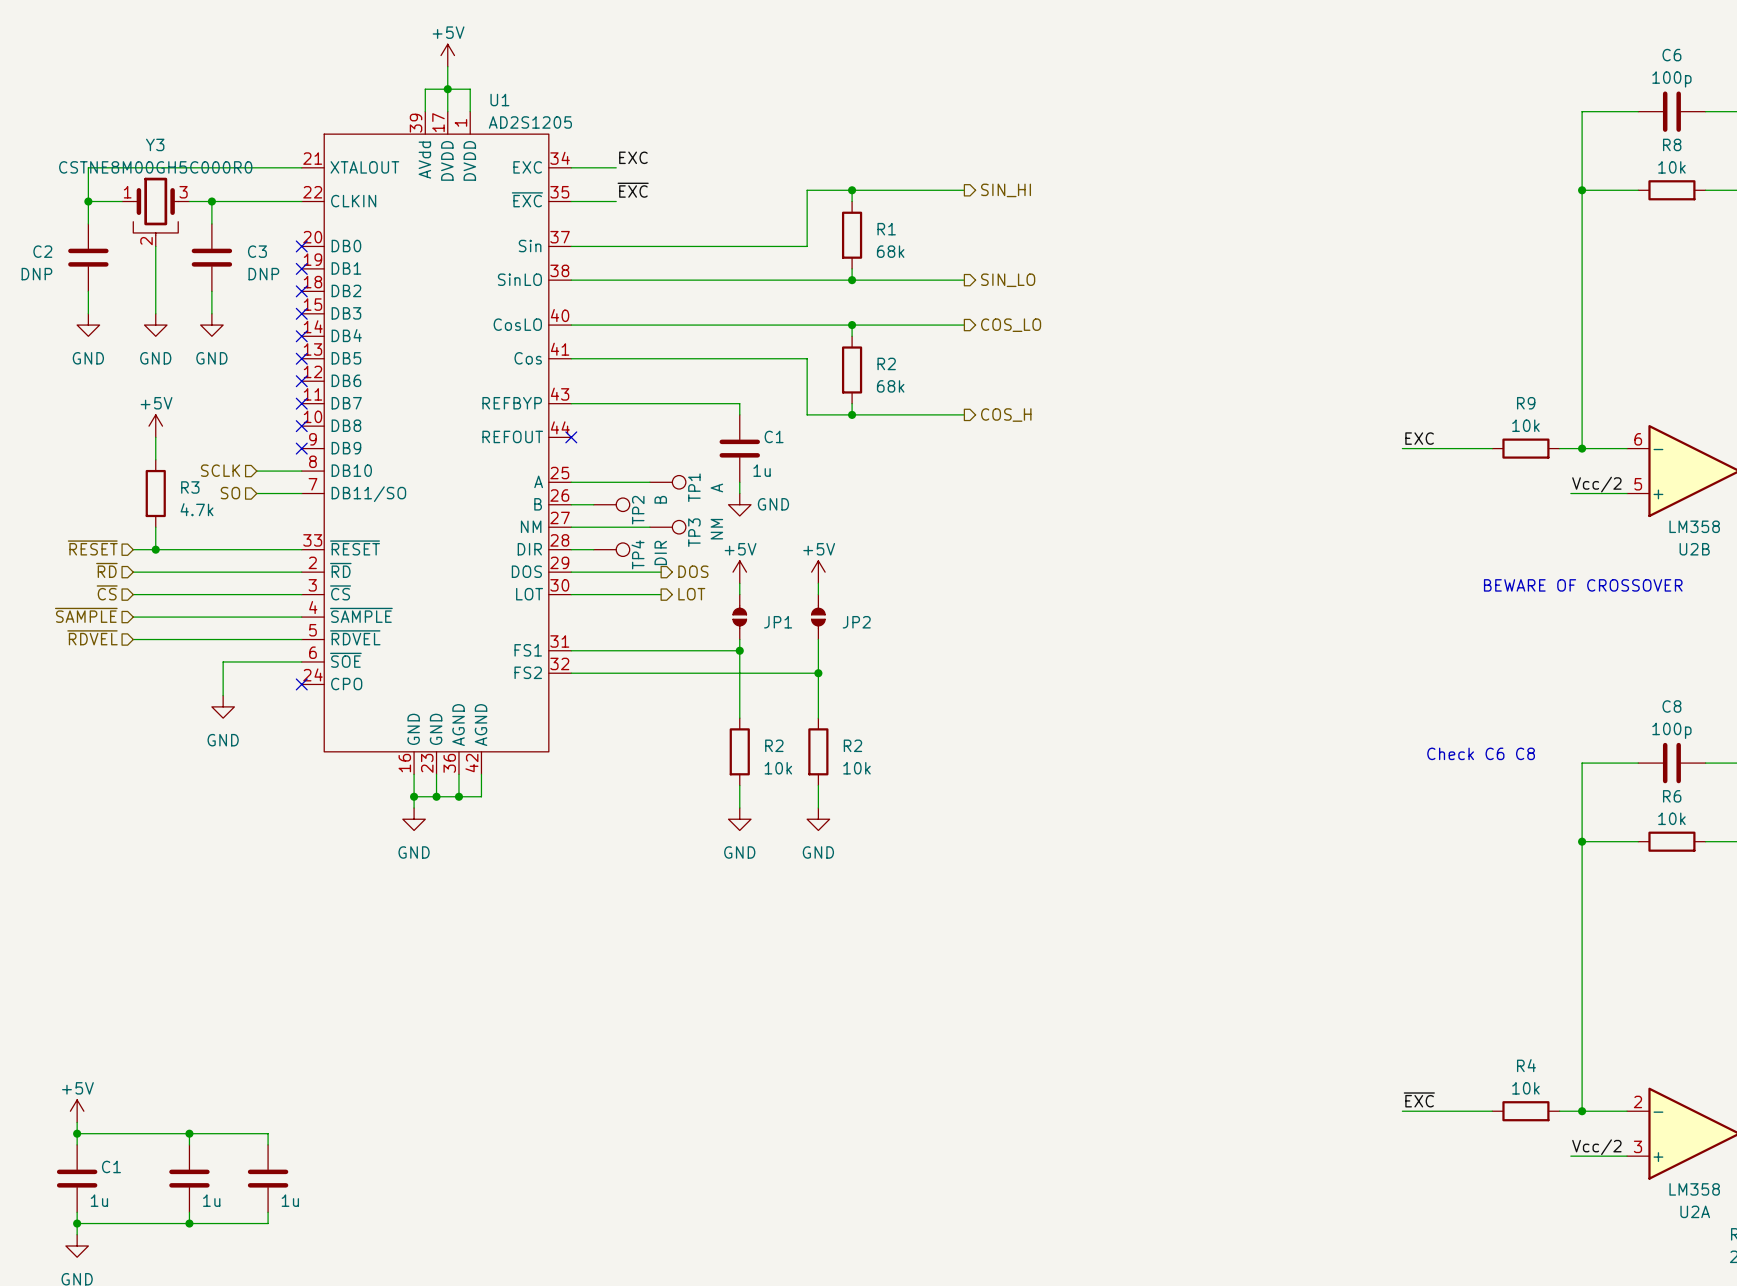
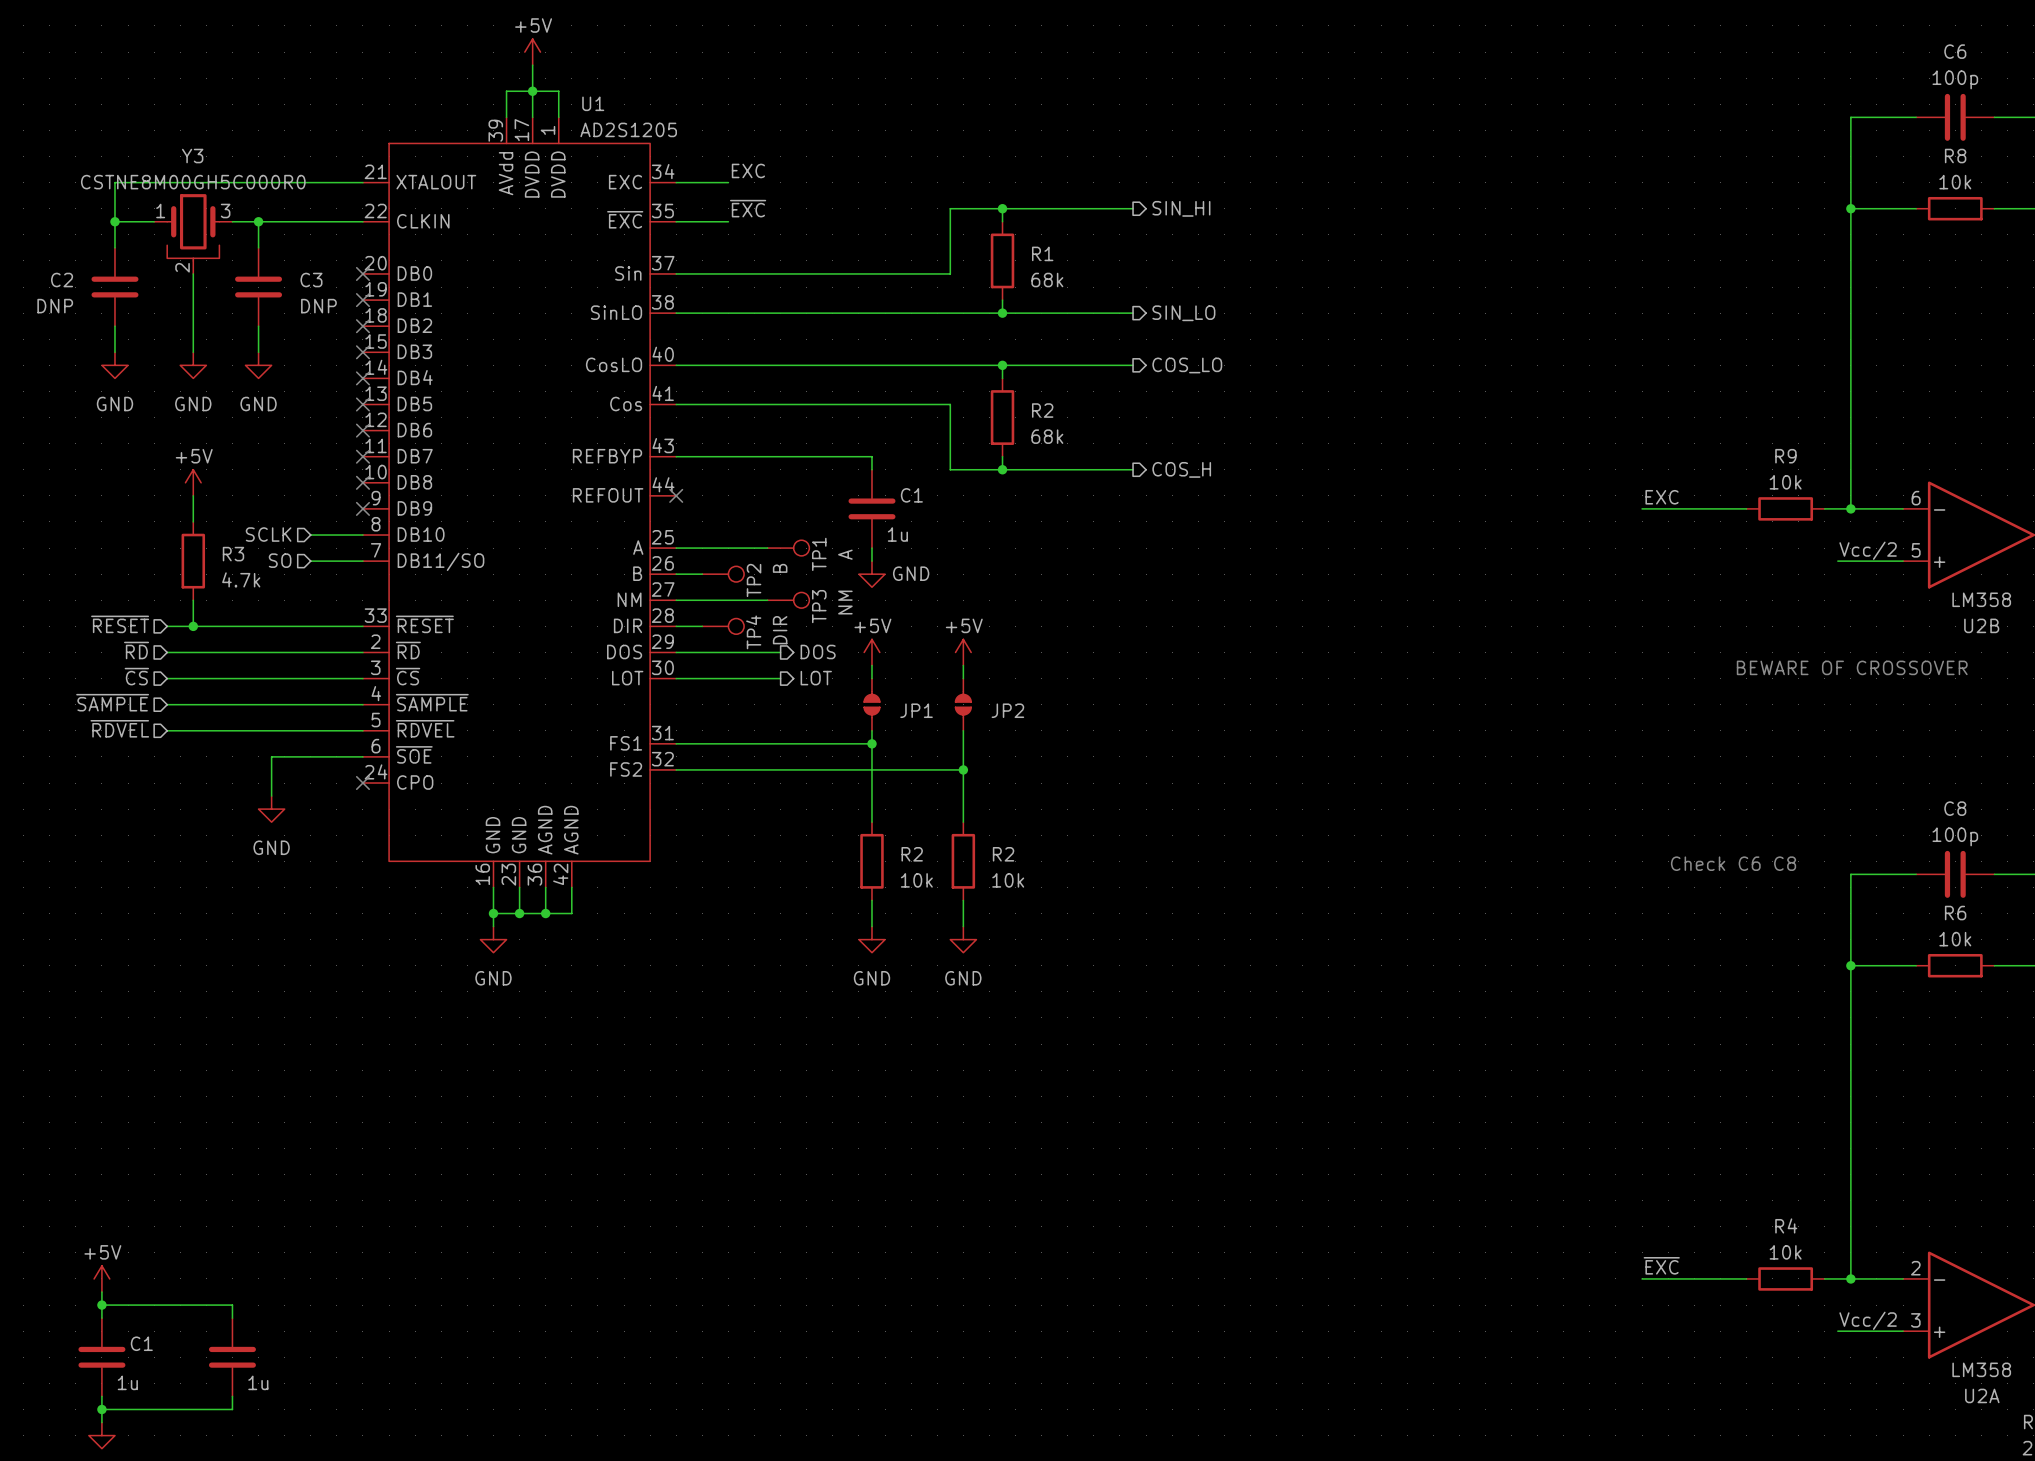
wire: (189, 1133) (268, 1133) (268, 1144) -> none
junction: (189, 1133) -> none
part: 1u (268, 1178) -> none
wire: (268, 1212) (268, 1223) (189, 1223) -> none
junction: (189, 1223) -> none

